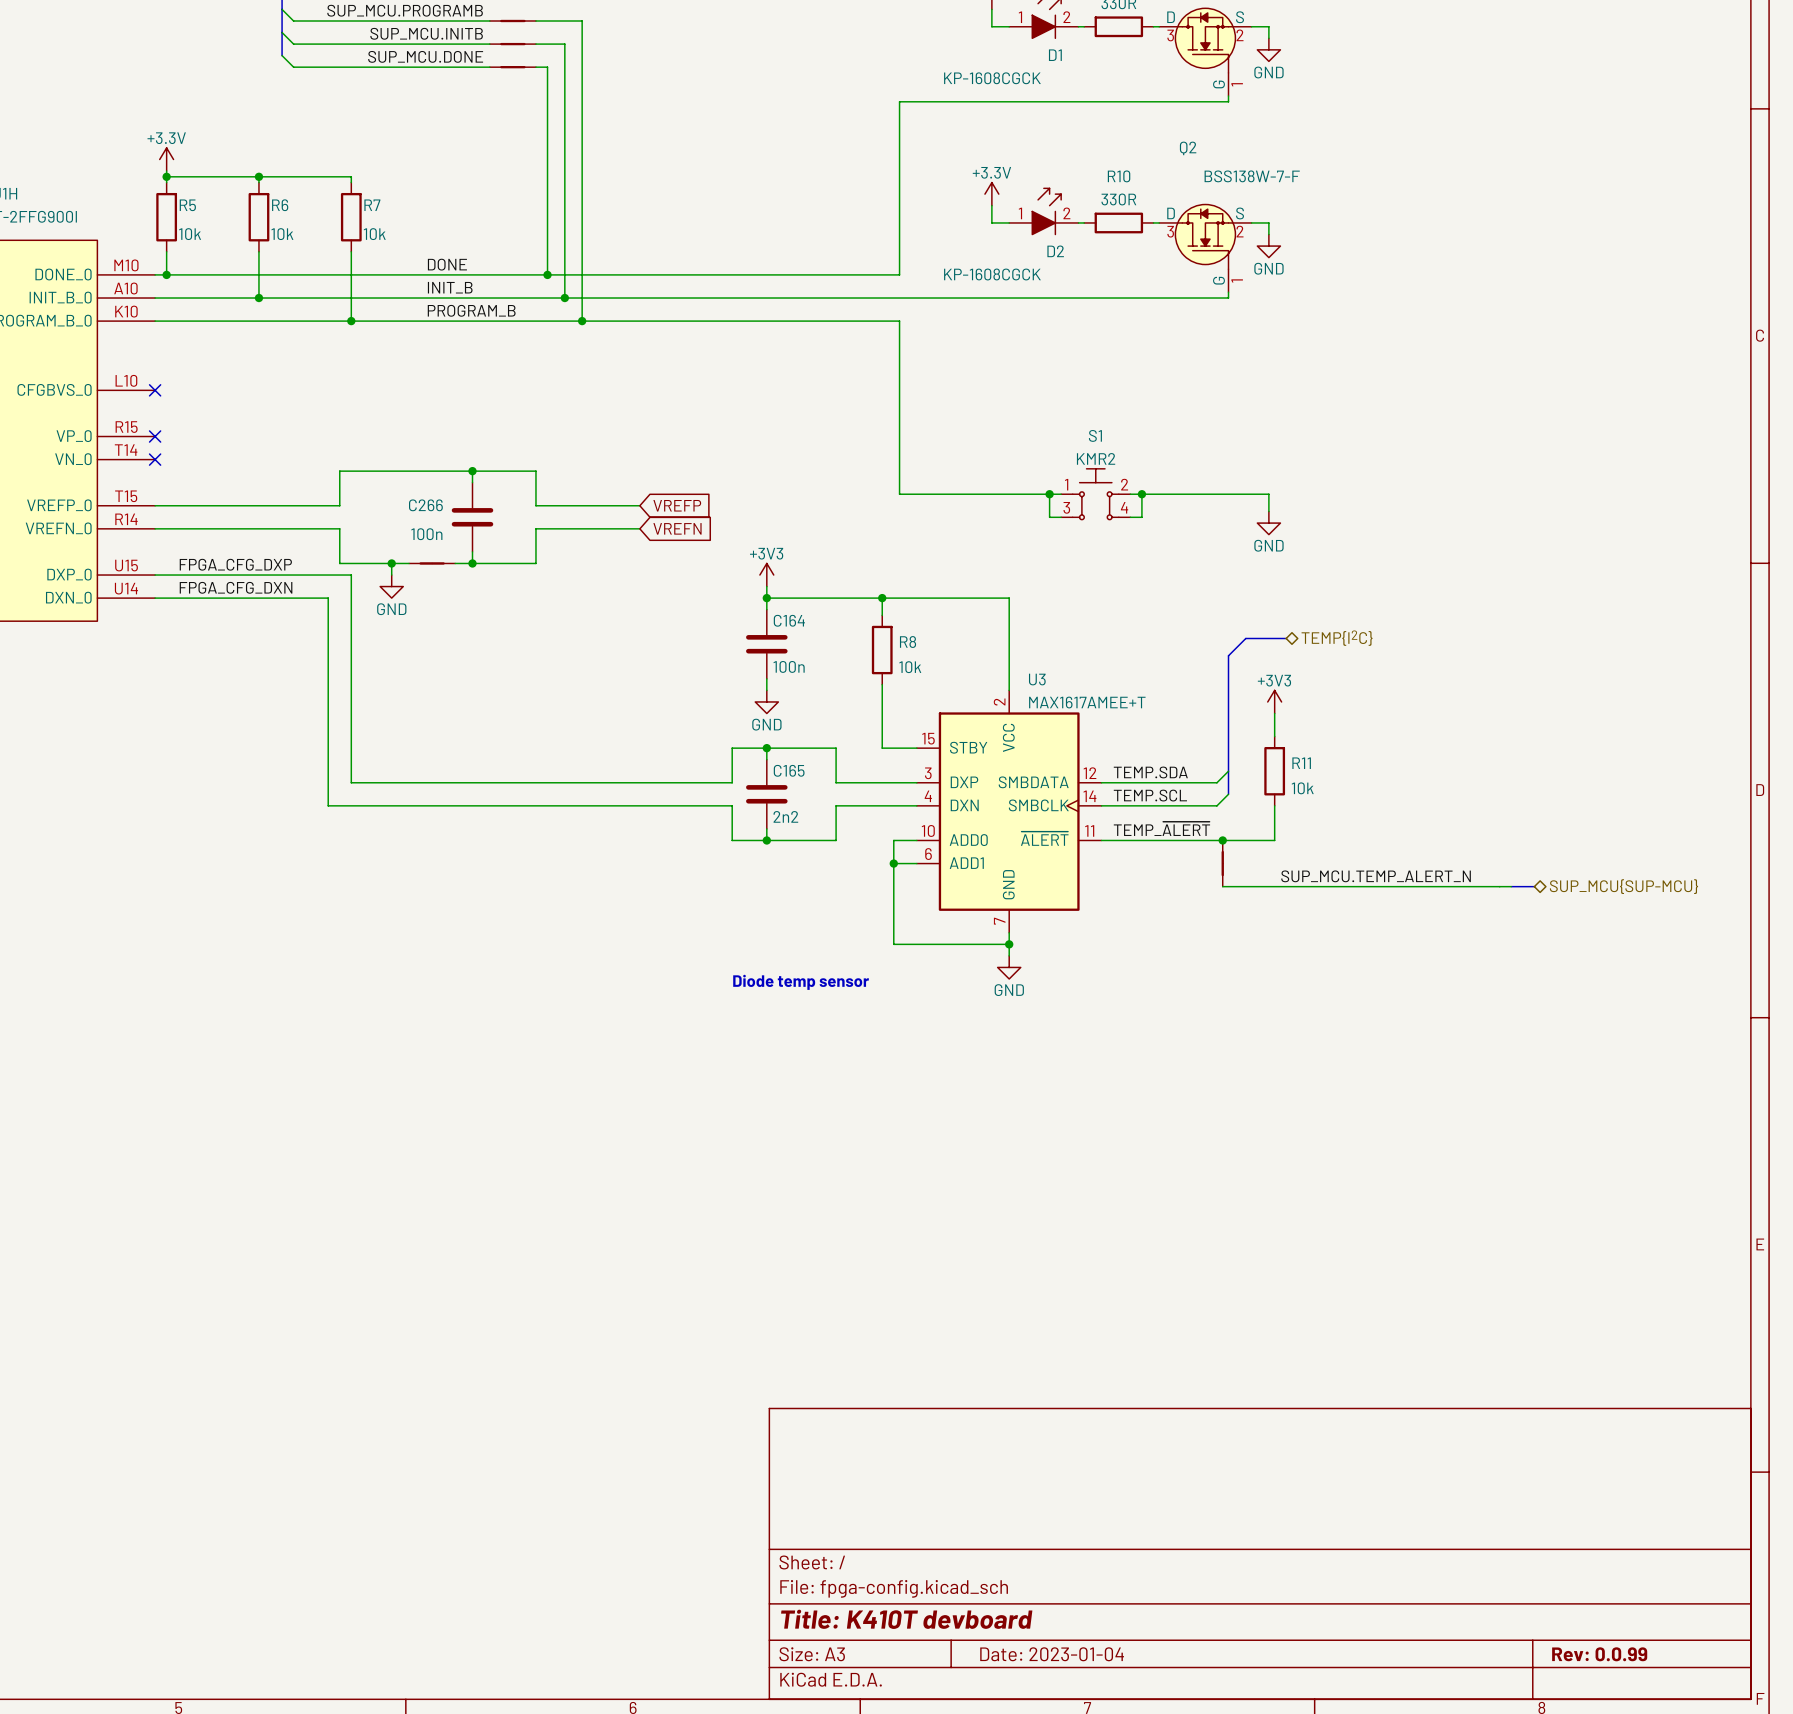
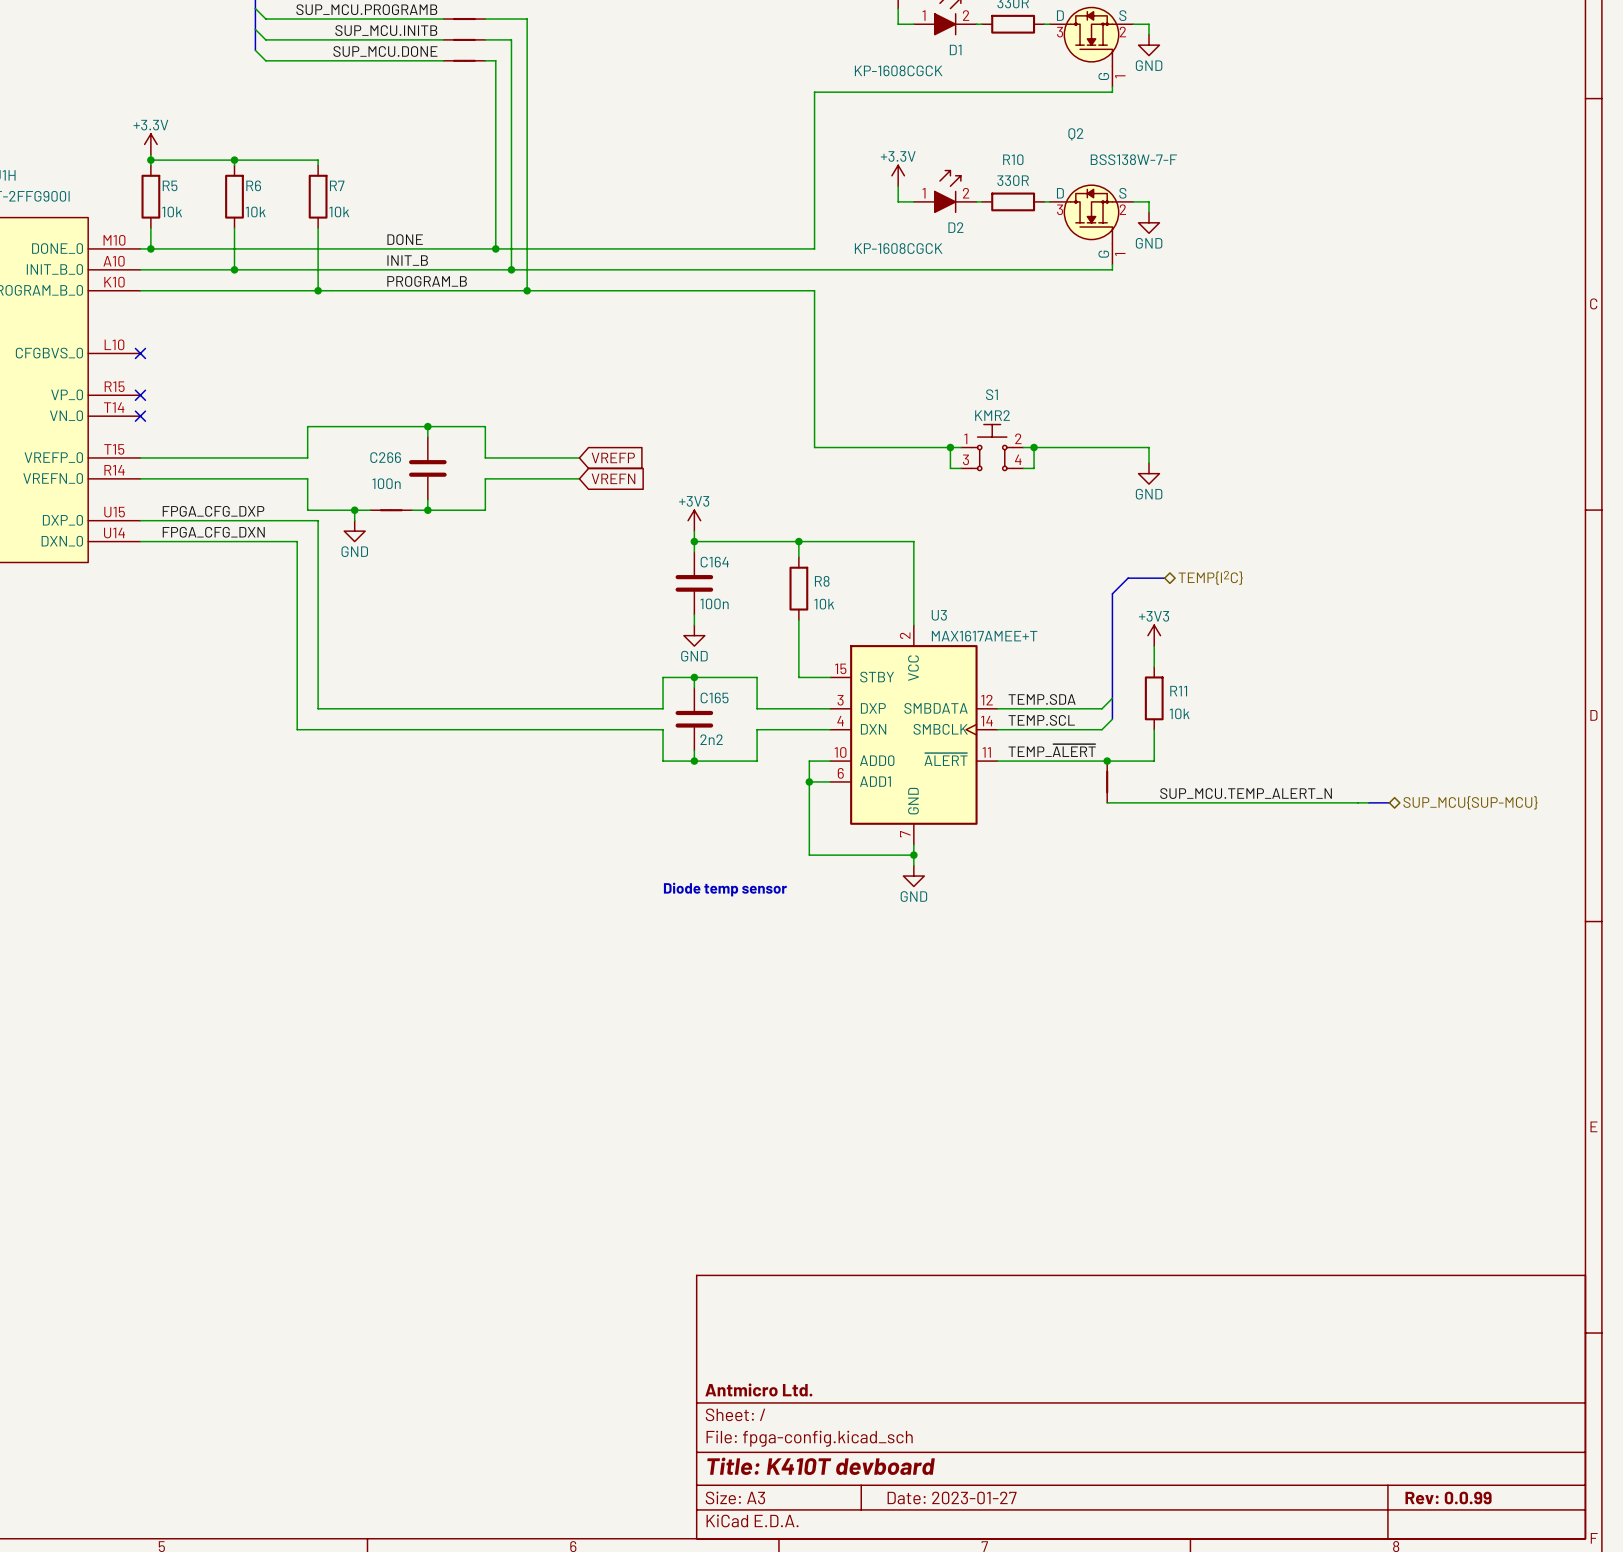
title block: none -> Antmicro Ltd. (758, 1389)
title block: Date: 2023-01-04 (1052, 1654) -> Date: 2023-01-27 (952, 1497)

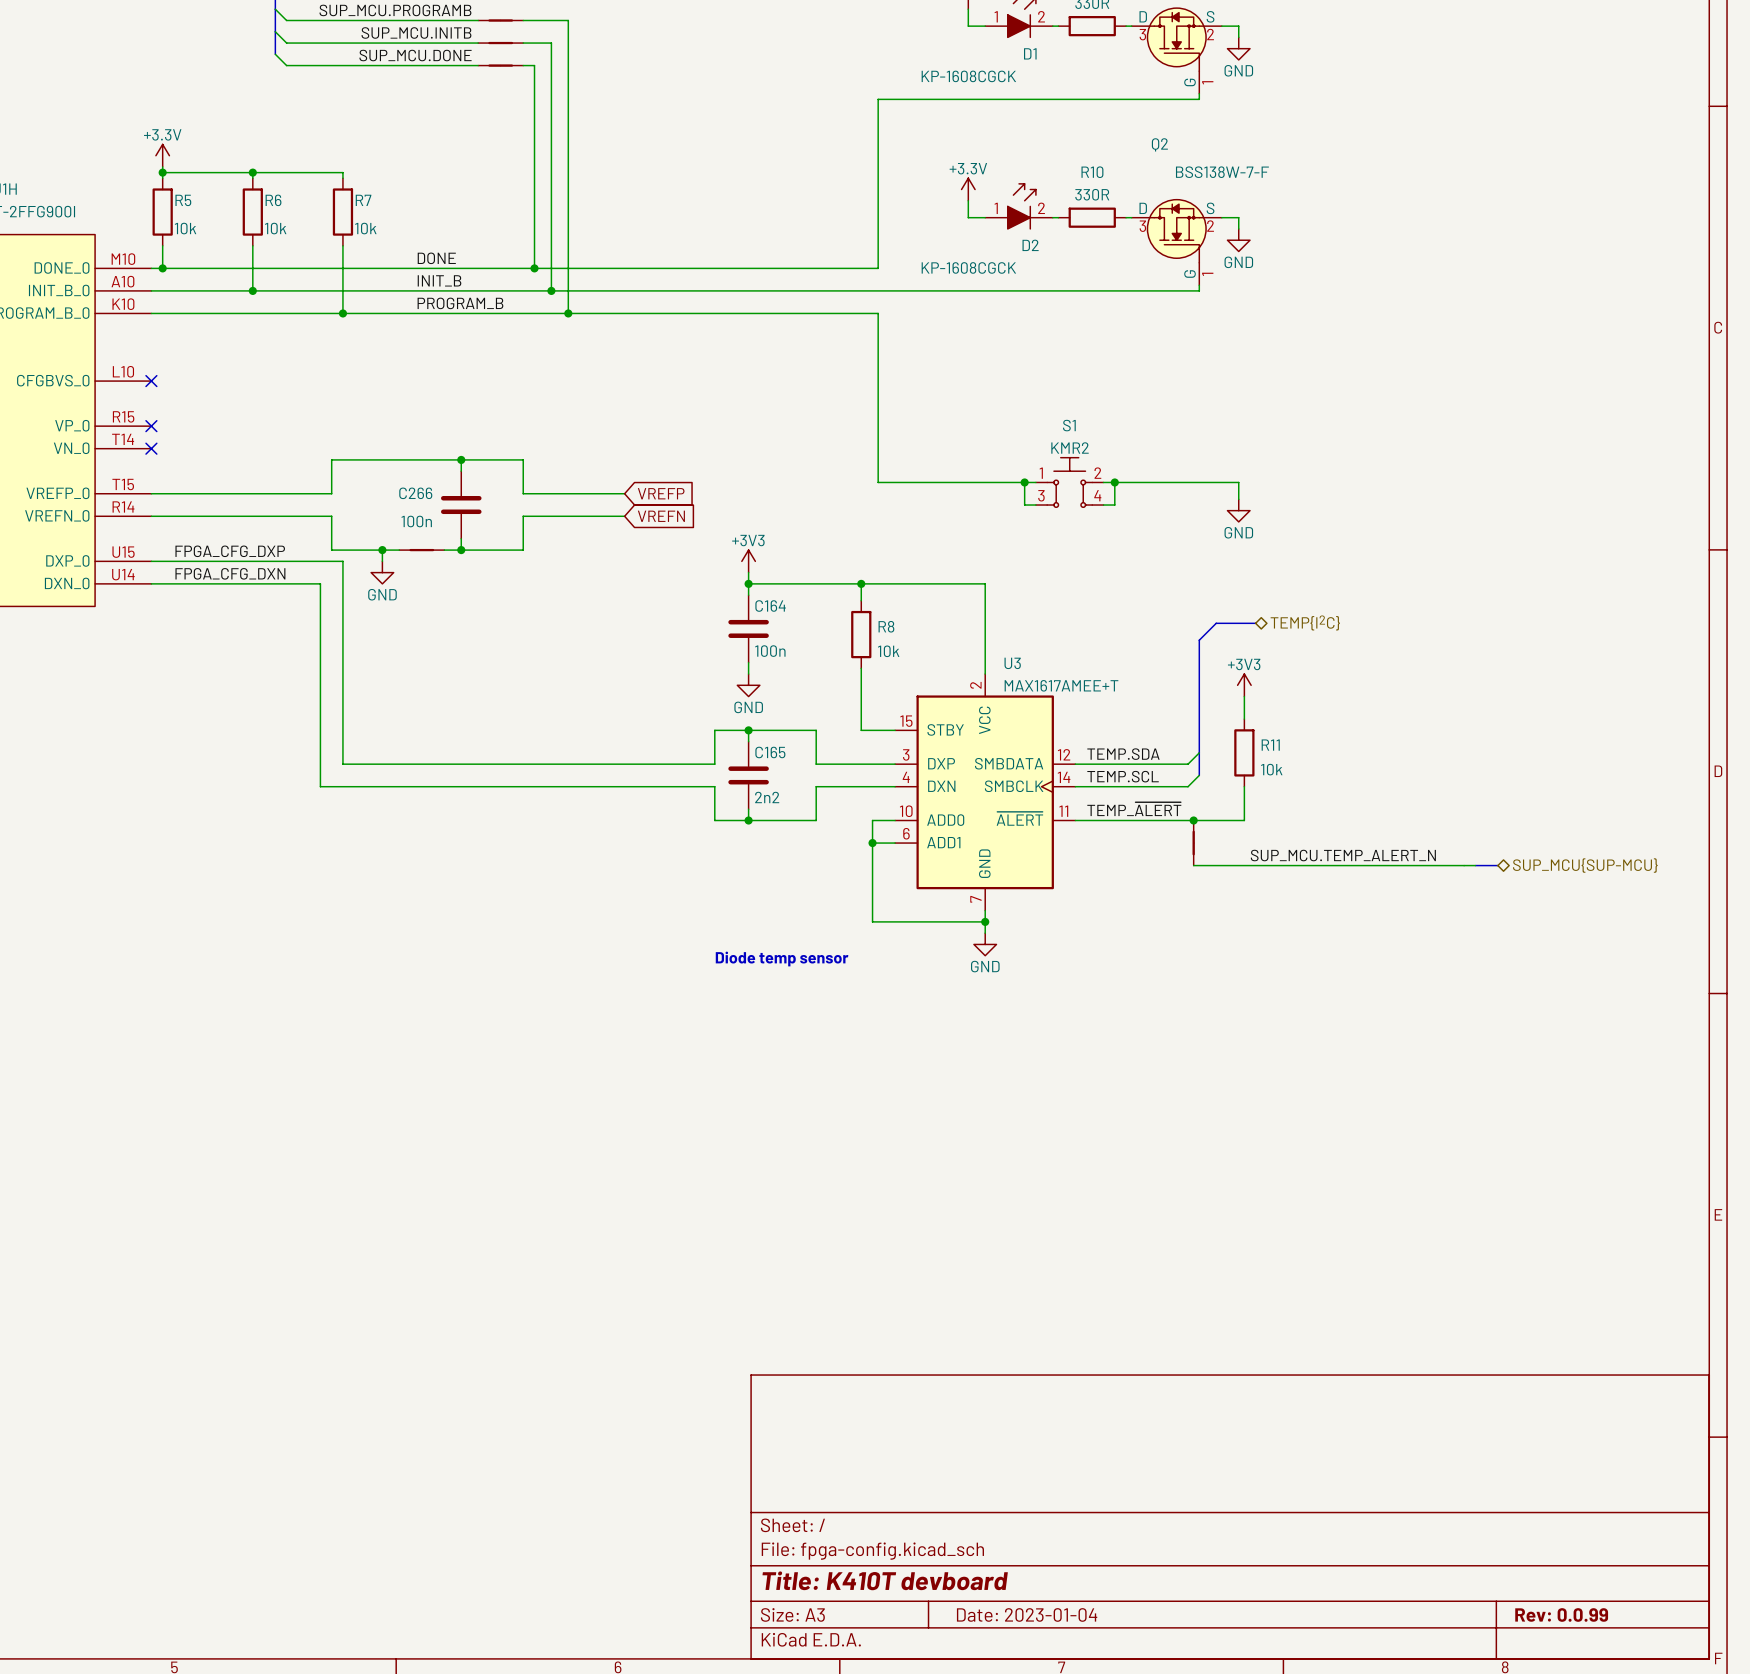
title block: Antmicro Ltd. (758, 1389) -> none
title block: Date: 2023-01-27 (952, 1497) -> Date: 2023-01-04 (1027, 1614)

